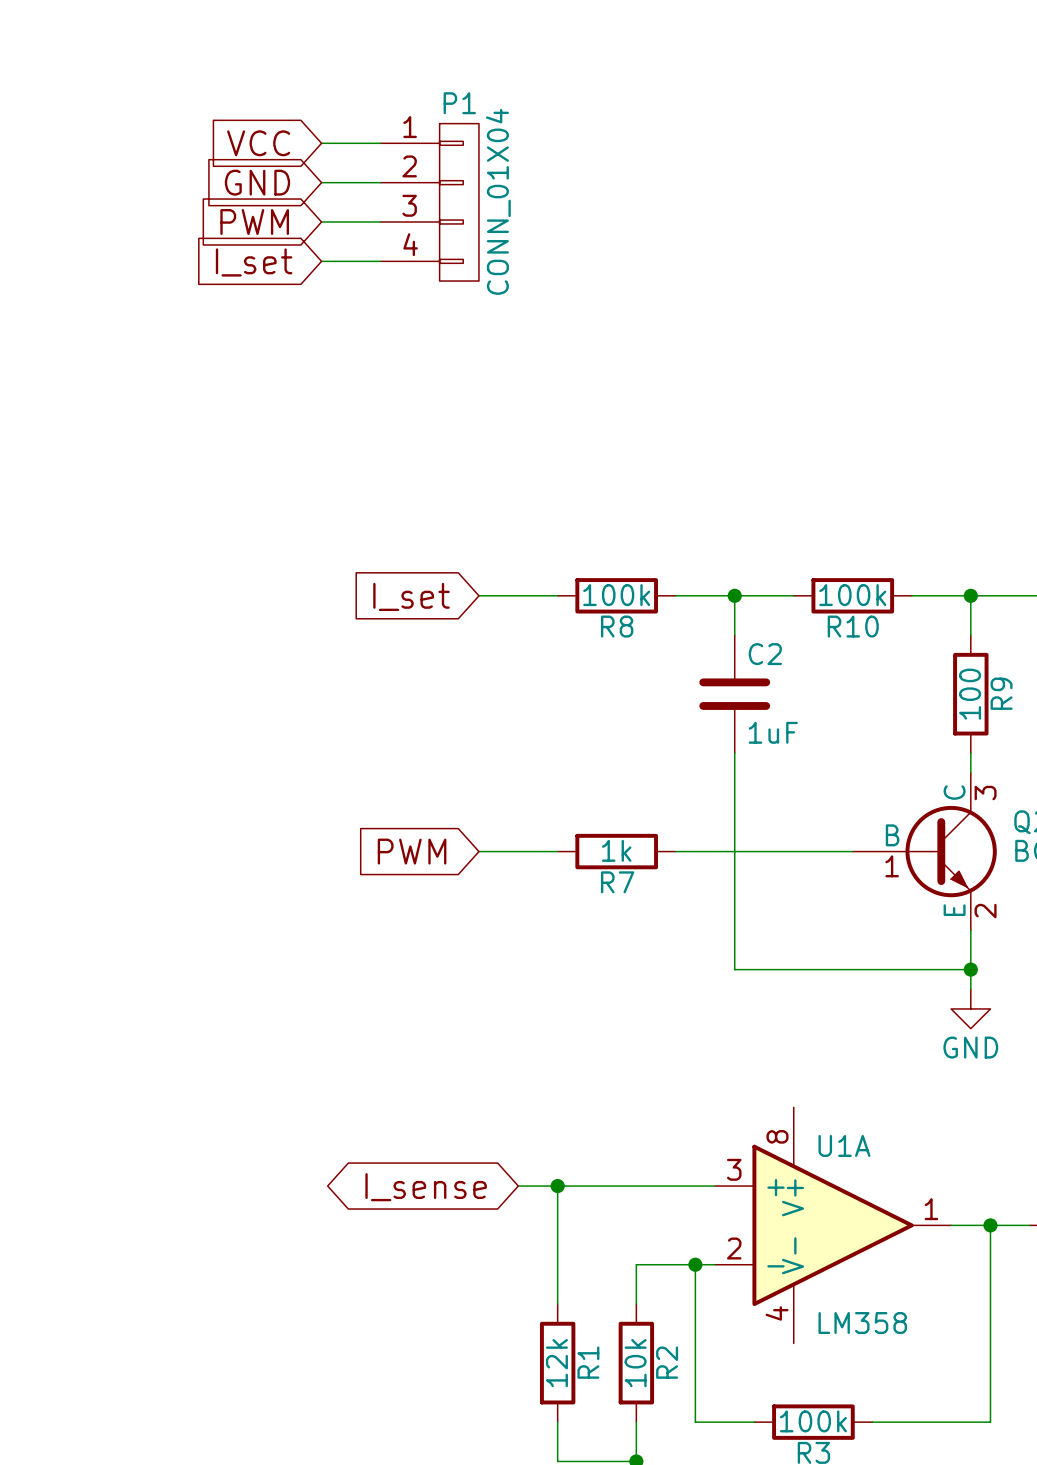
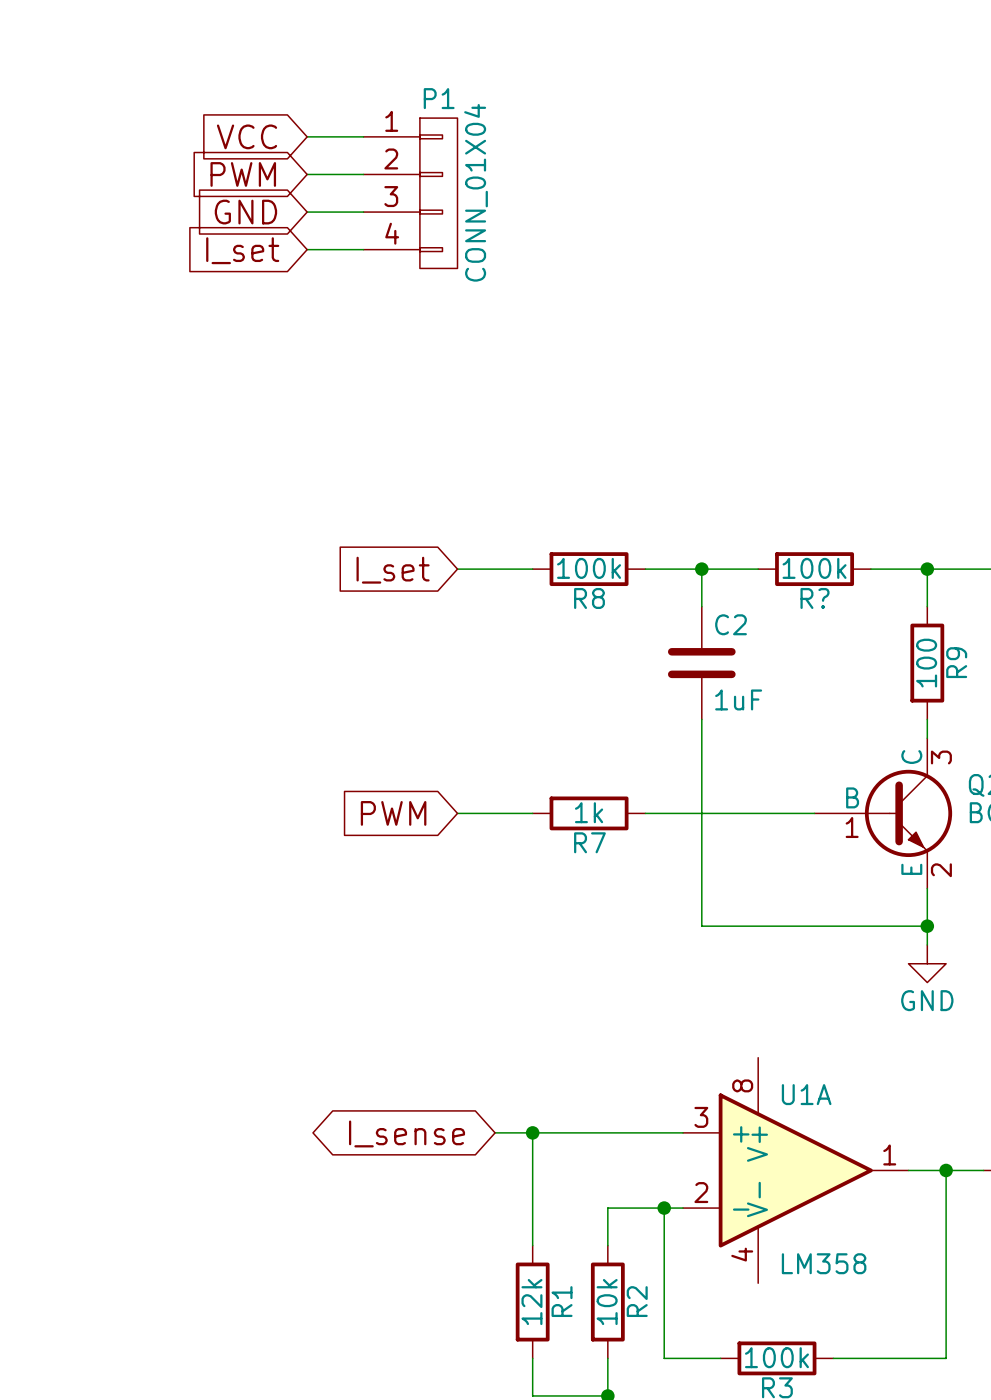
global label: GND (257, 182) -> PWM (243, 174)
global label: PWM (254, 222) -> GND (245, 212)
R10 name: R10 (853, 626) -> R? (815, 598)

